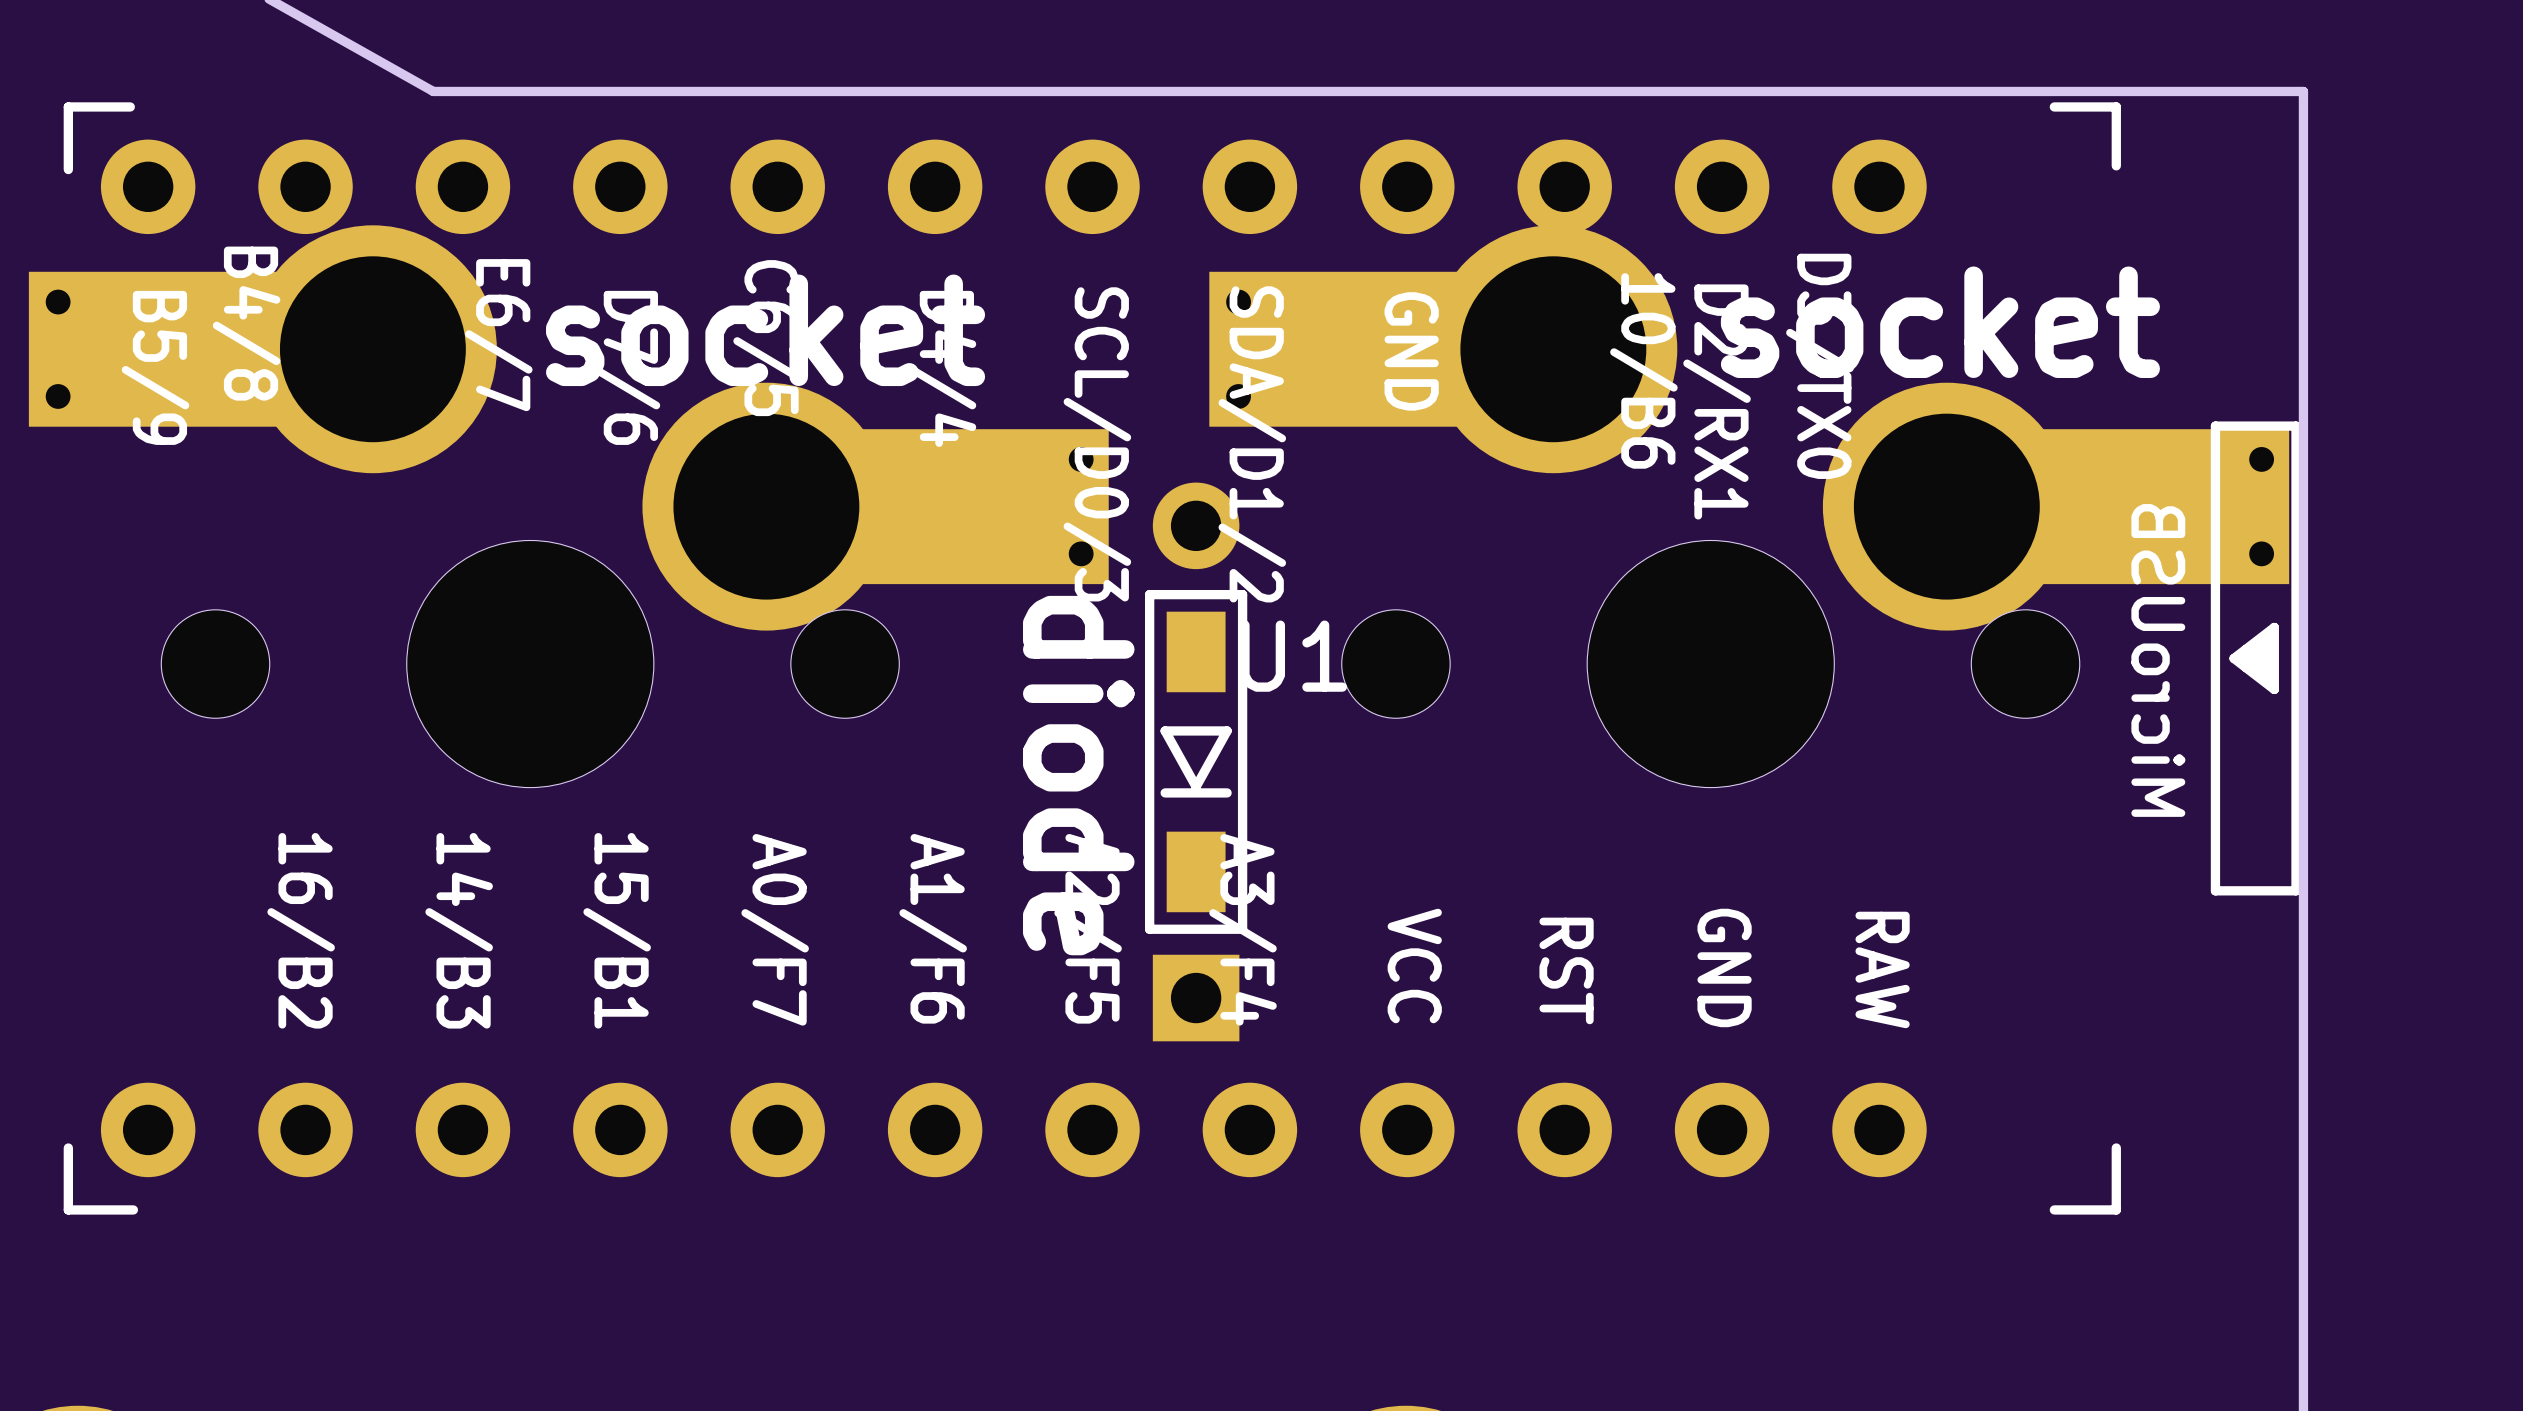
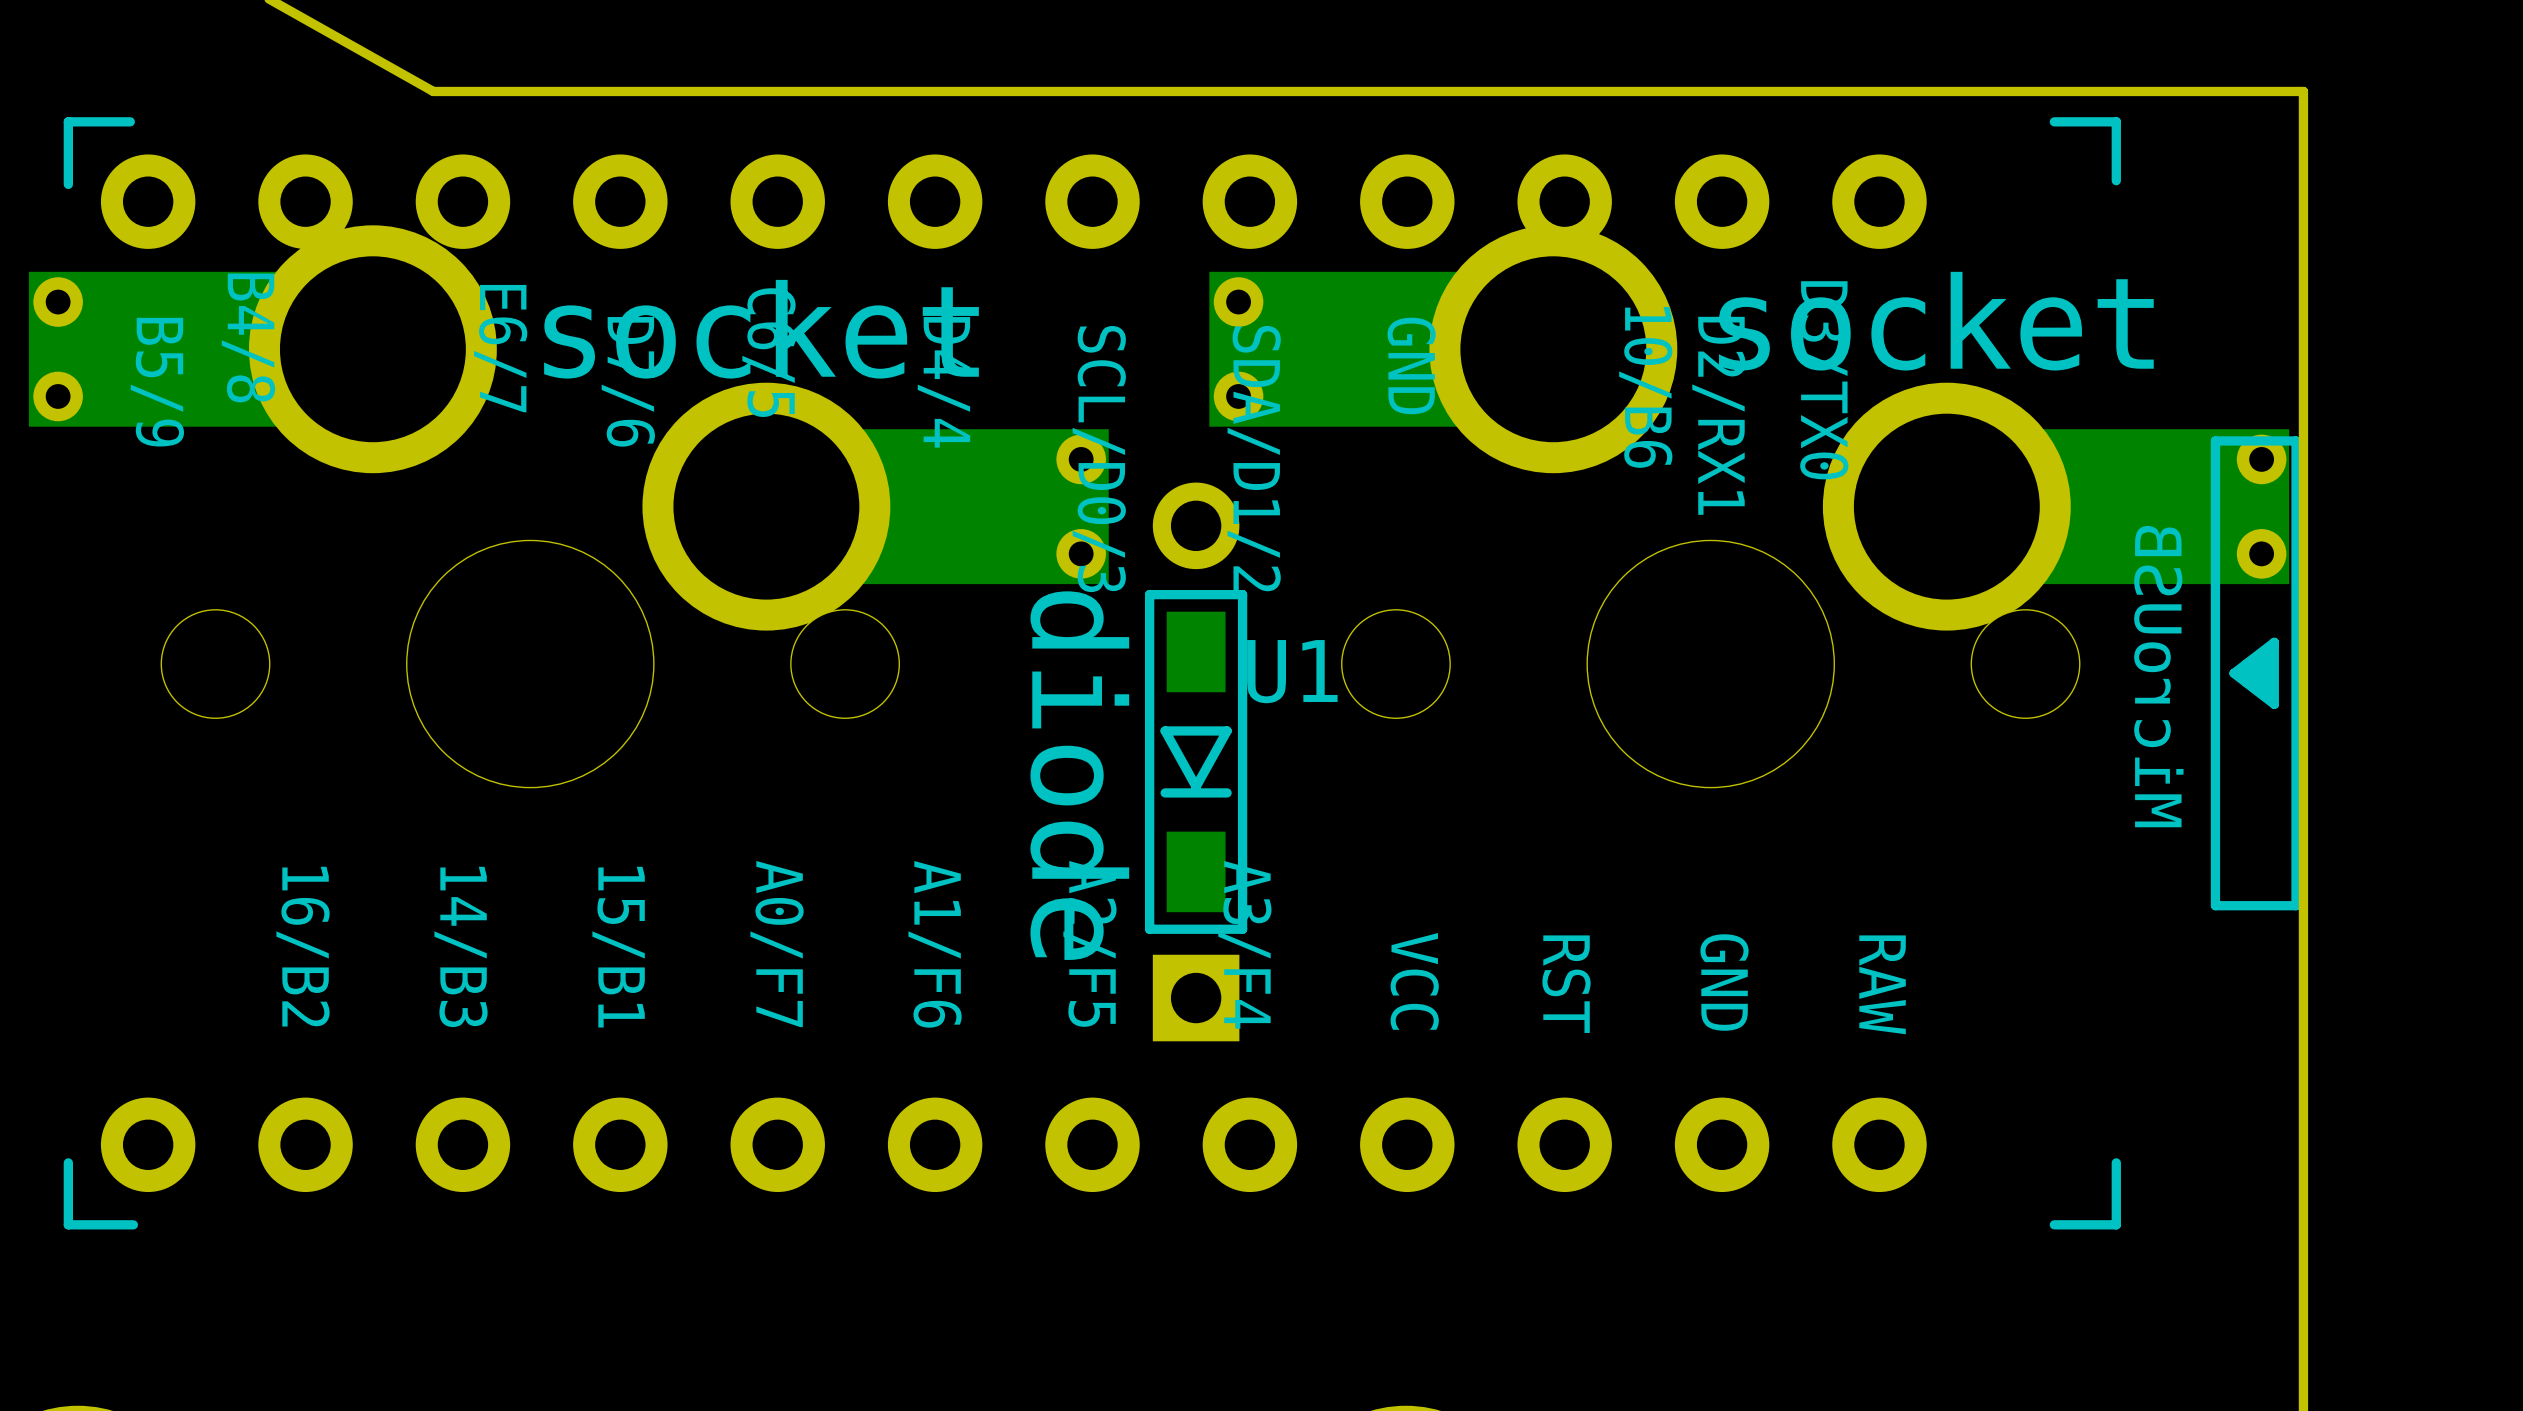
U1 position: (1182, 658) -> (1182, 673)

